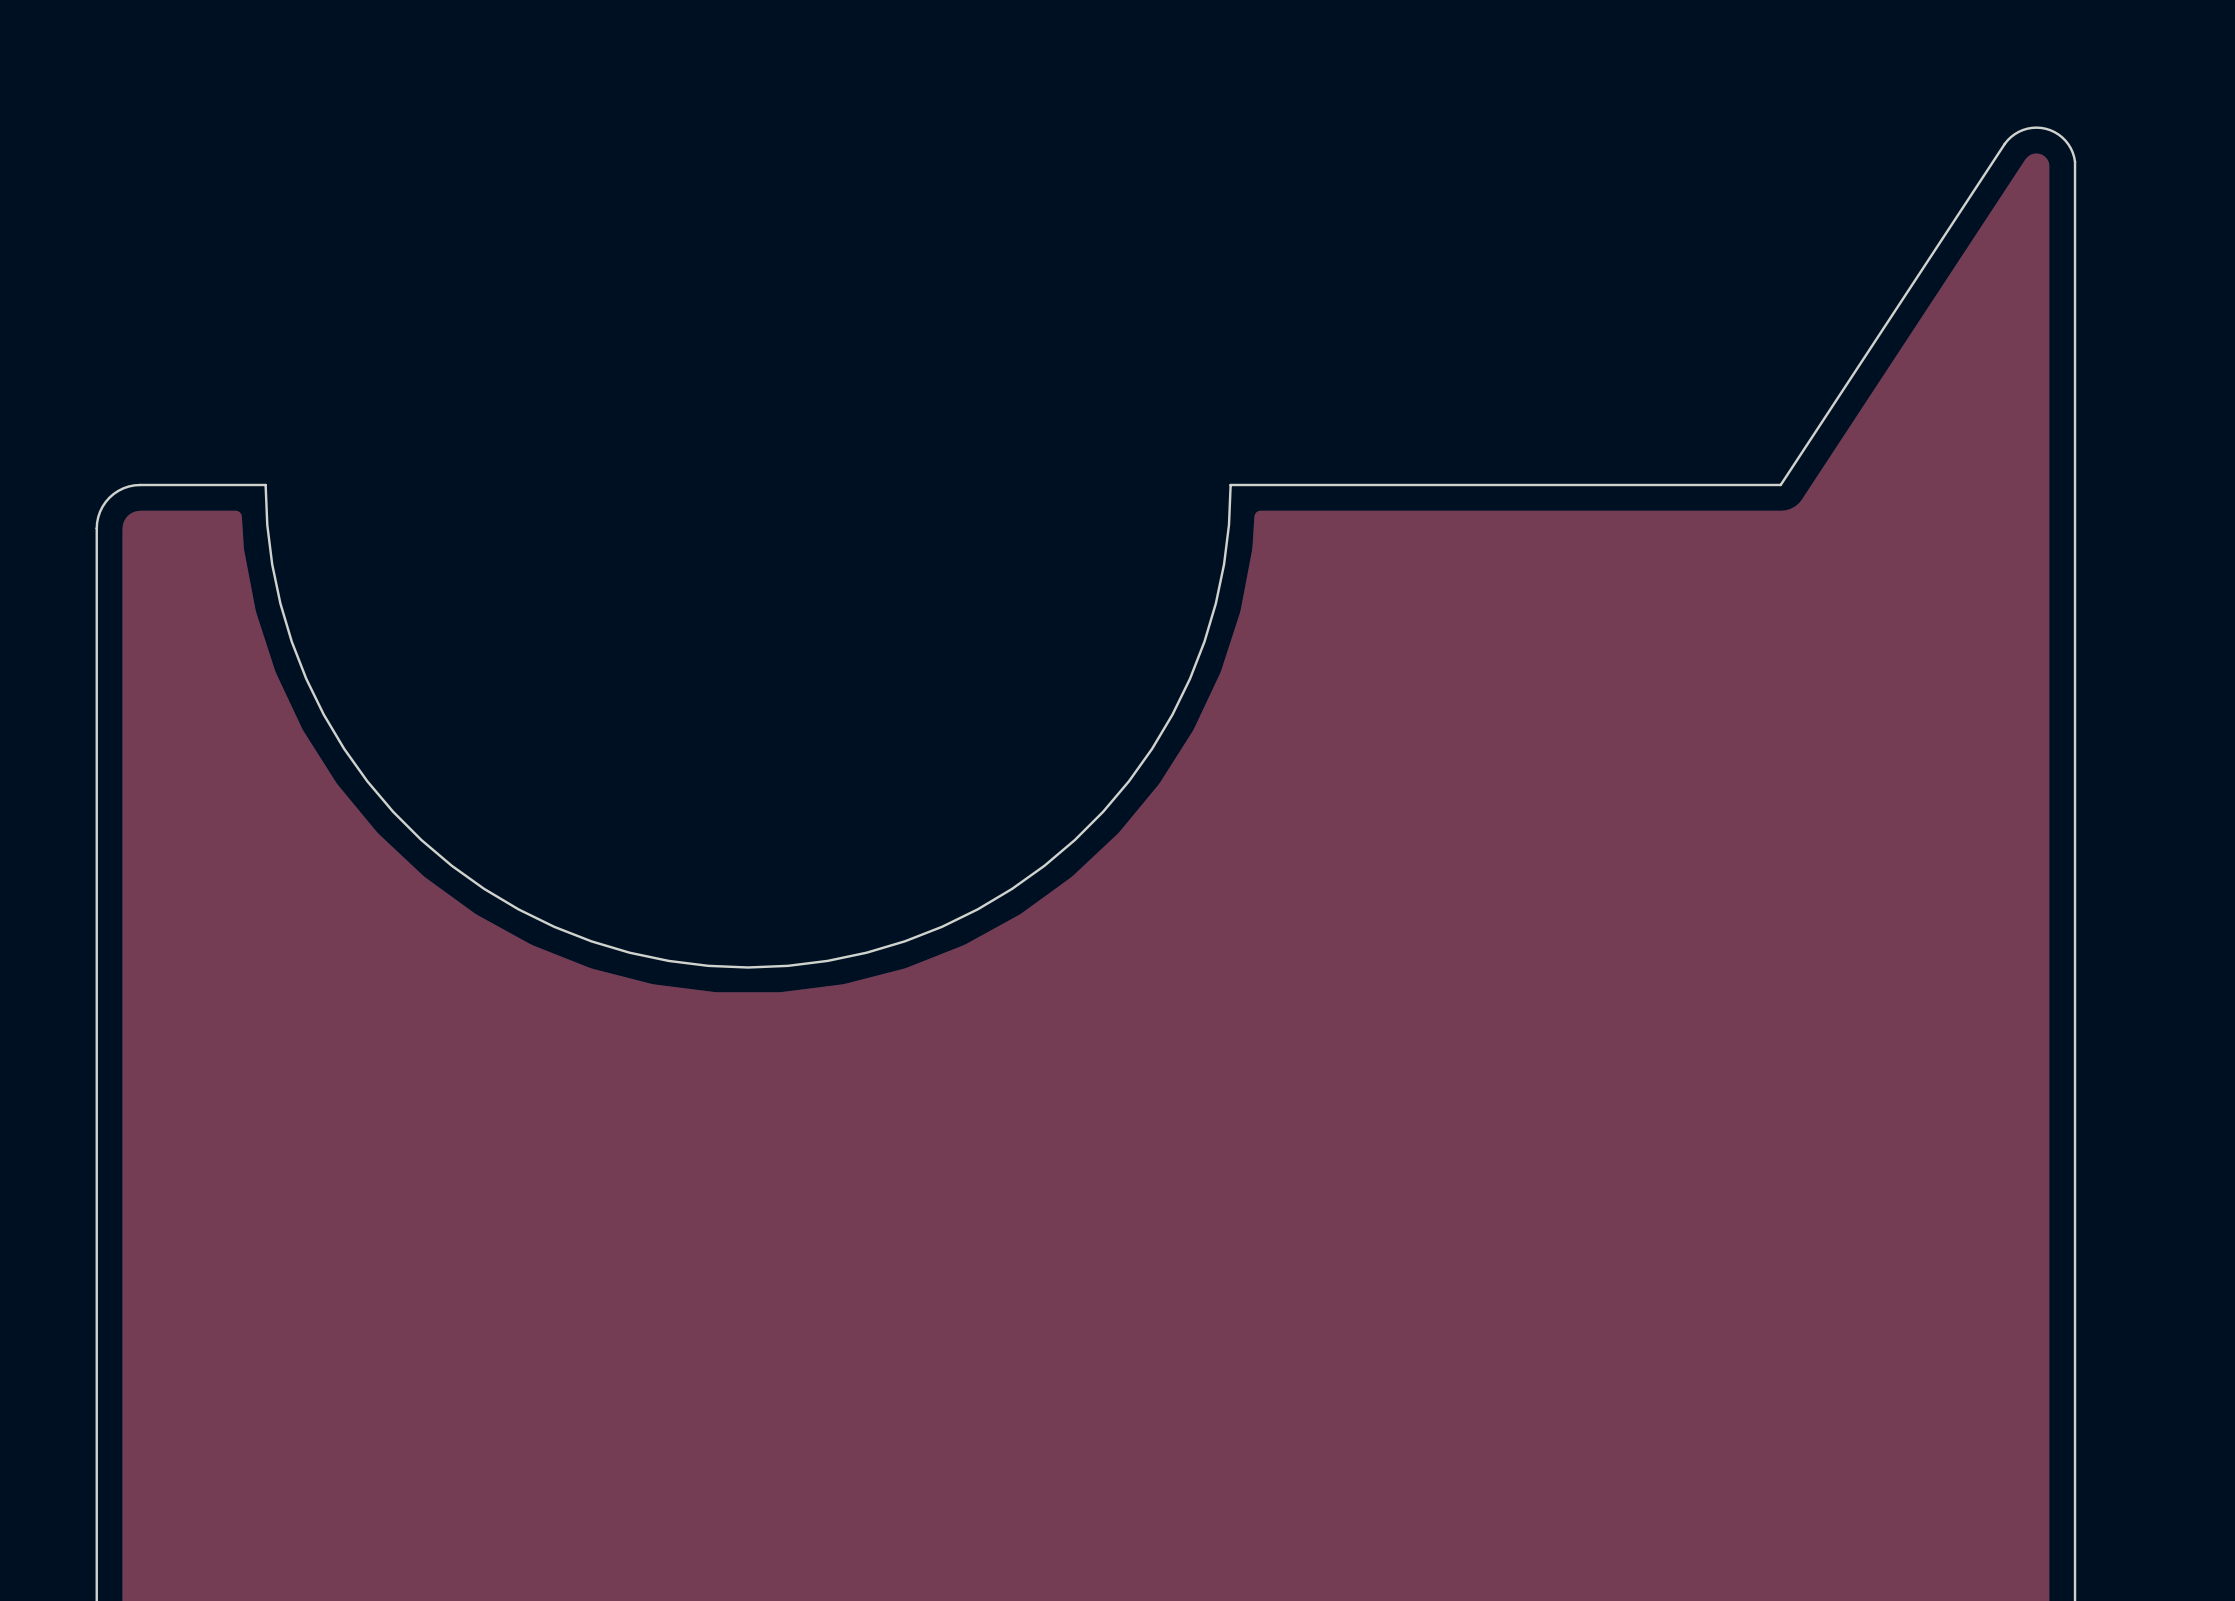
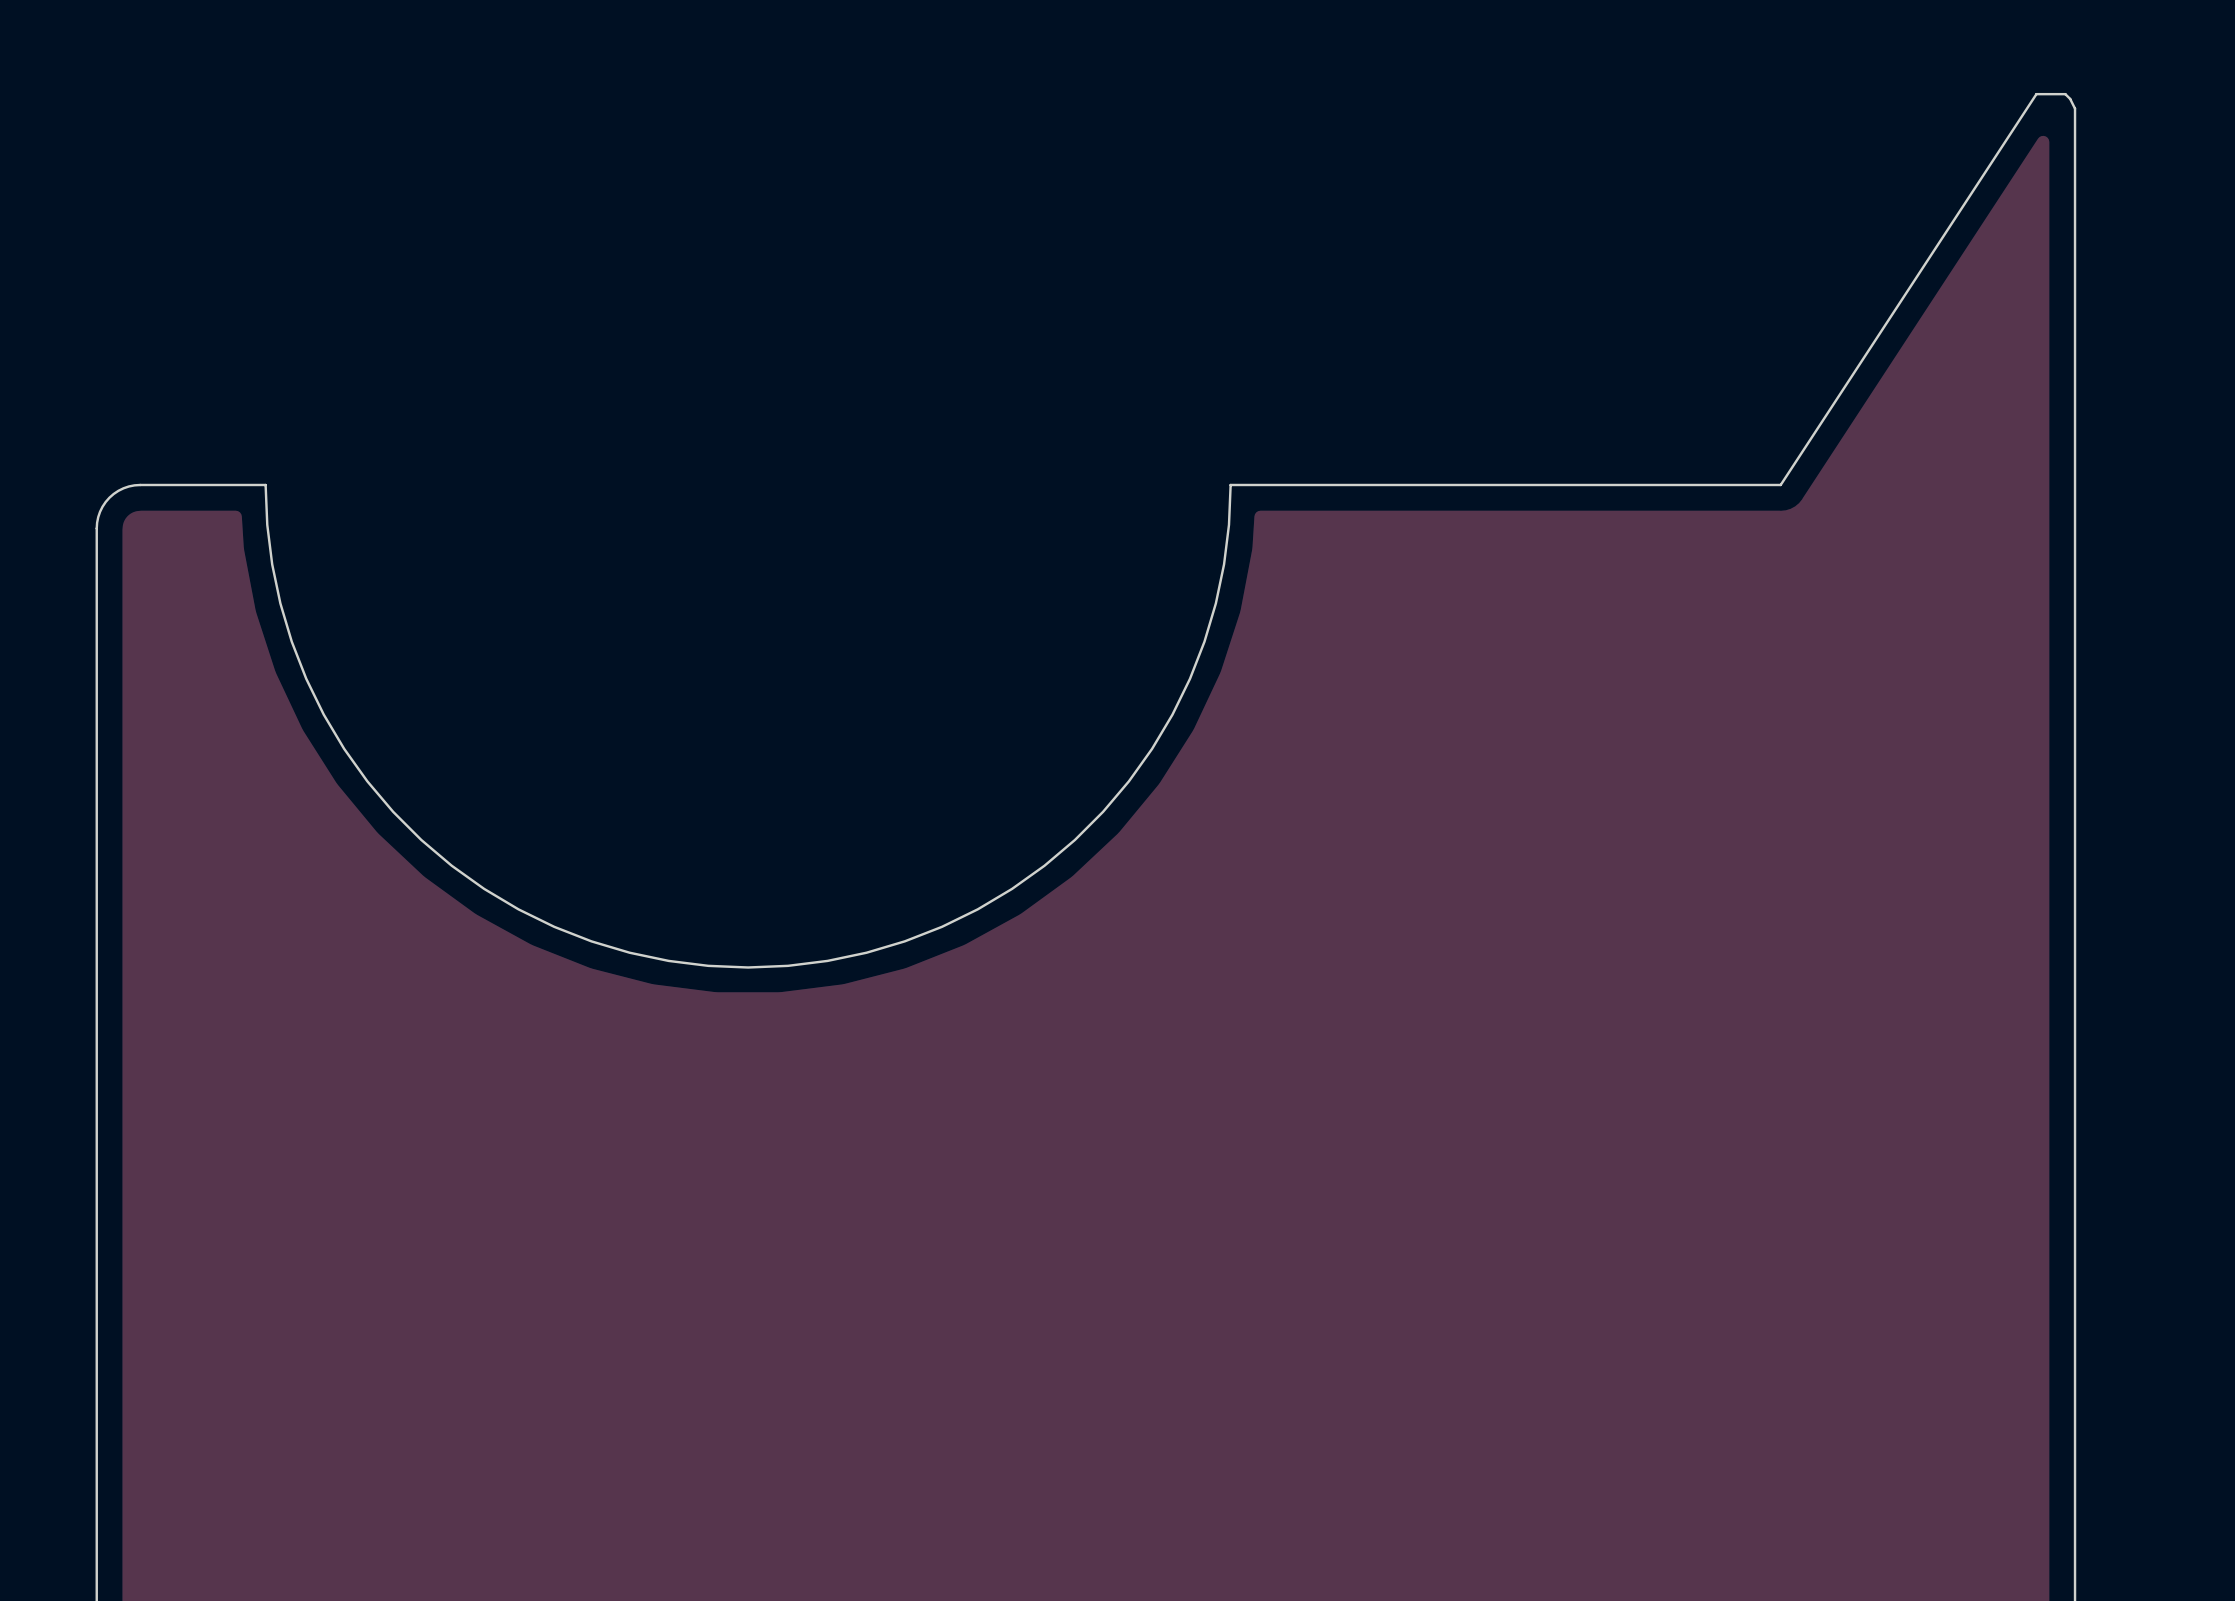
board edge: (2075, 161) (2072, 152) (2065, 140) (2054, 132) (2045, 128) (2036, 127) (2023, 130) (2007, 140) (1780, 484) -> (2075, 161) (2075, 108) (2070, 98) (2065, 94) (2036, 94) (1780, 484)

